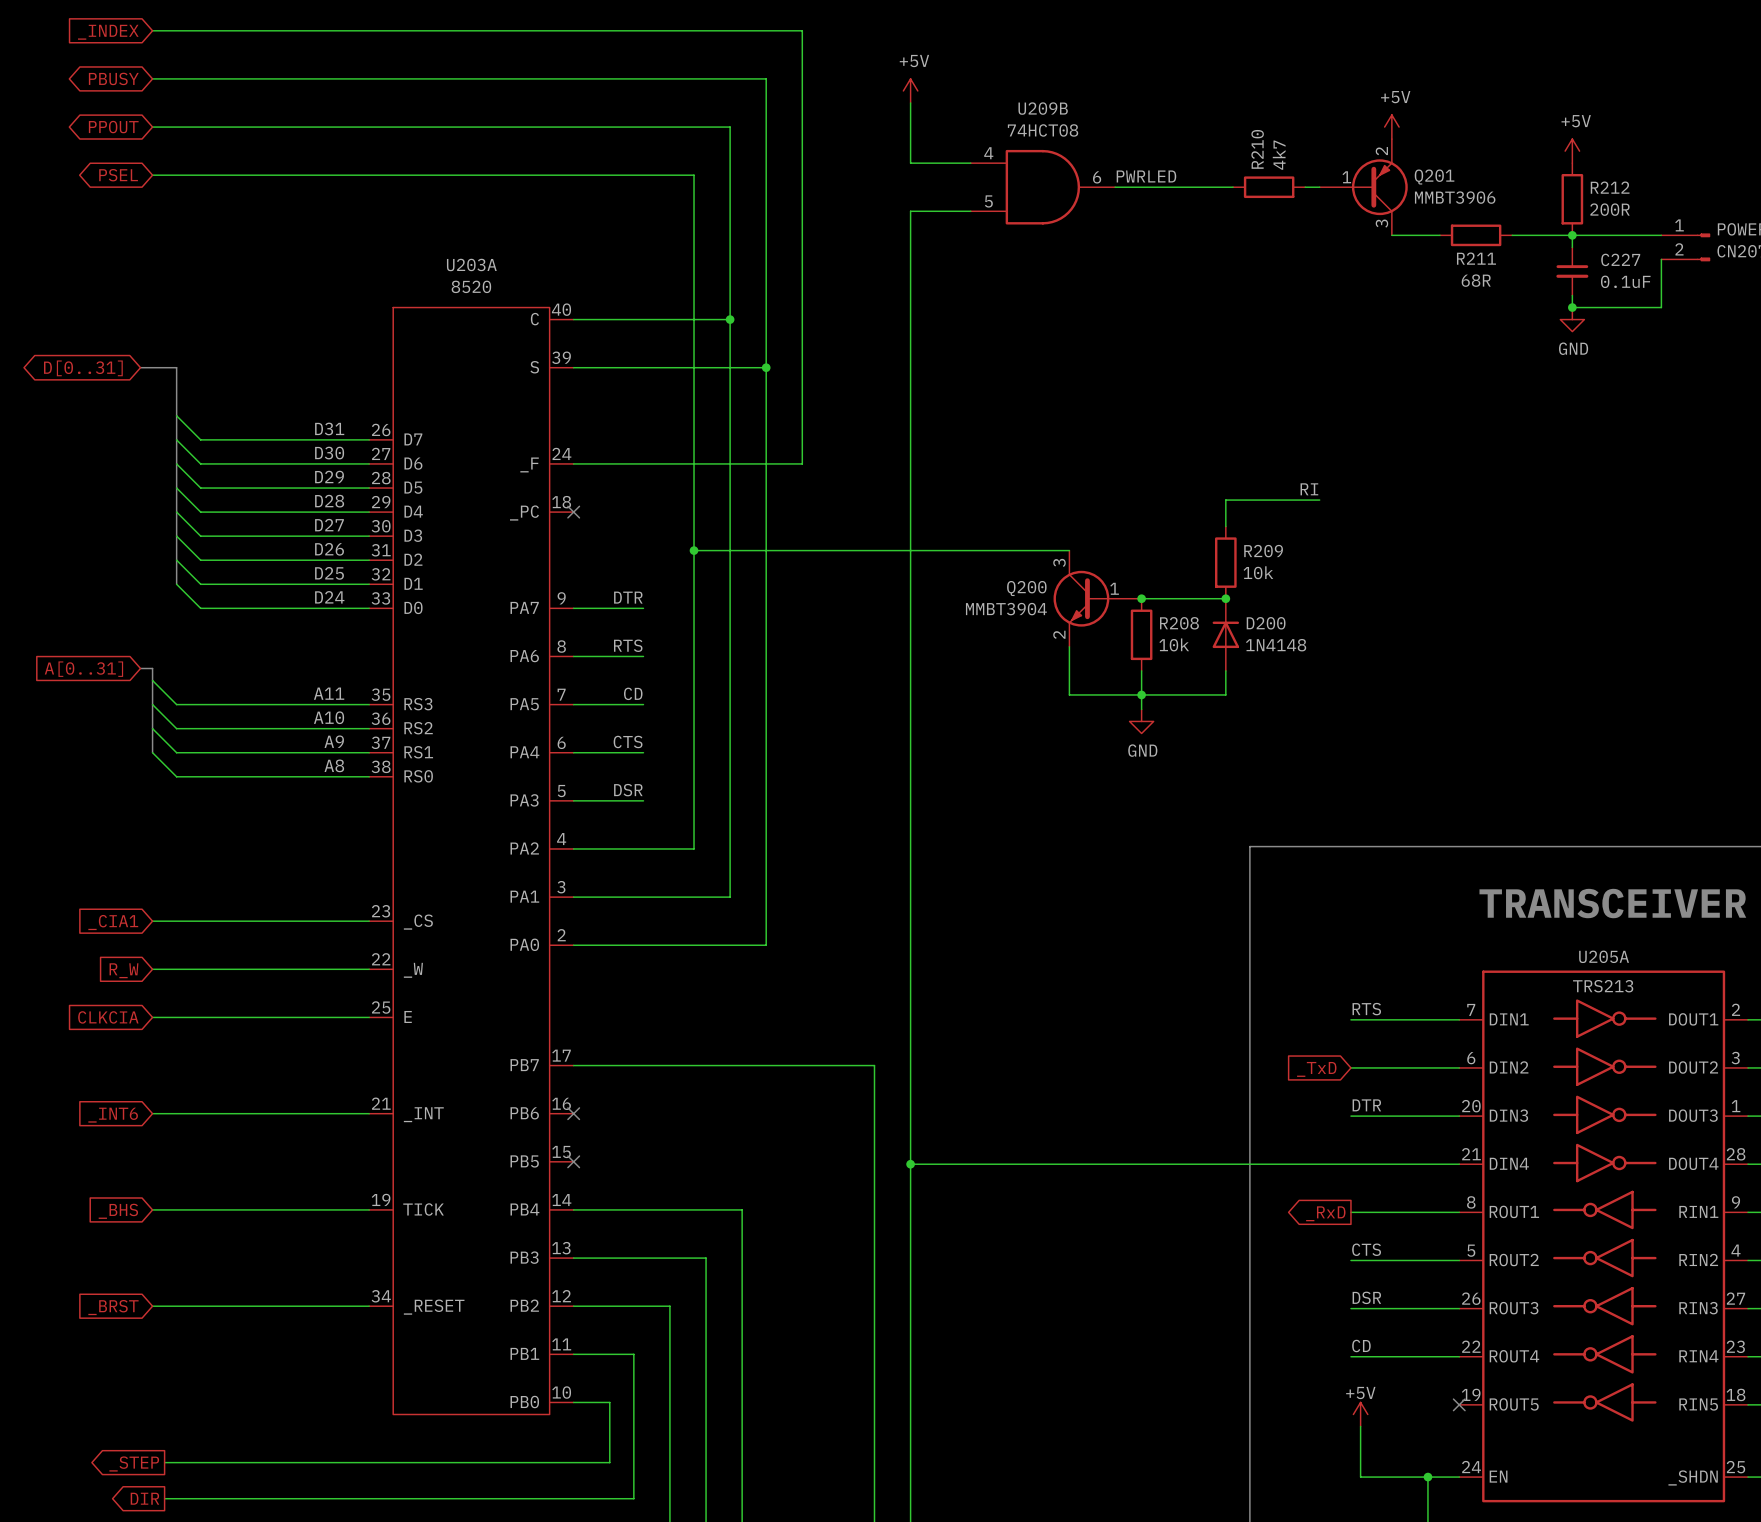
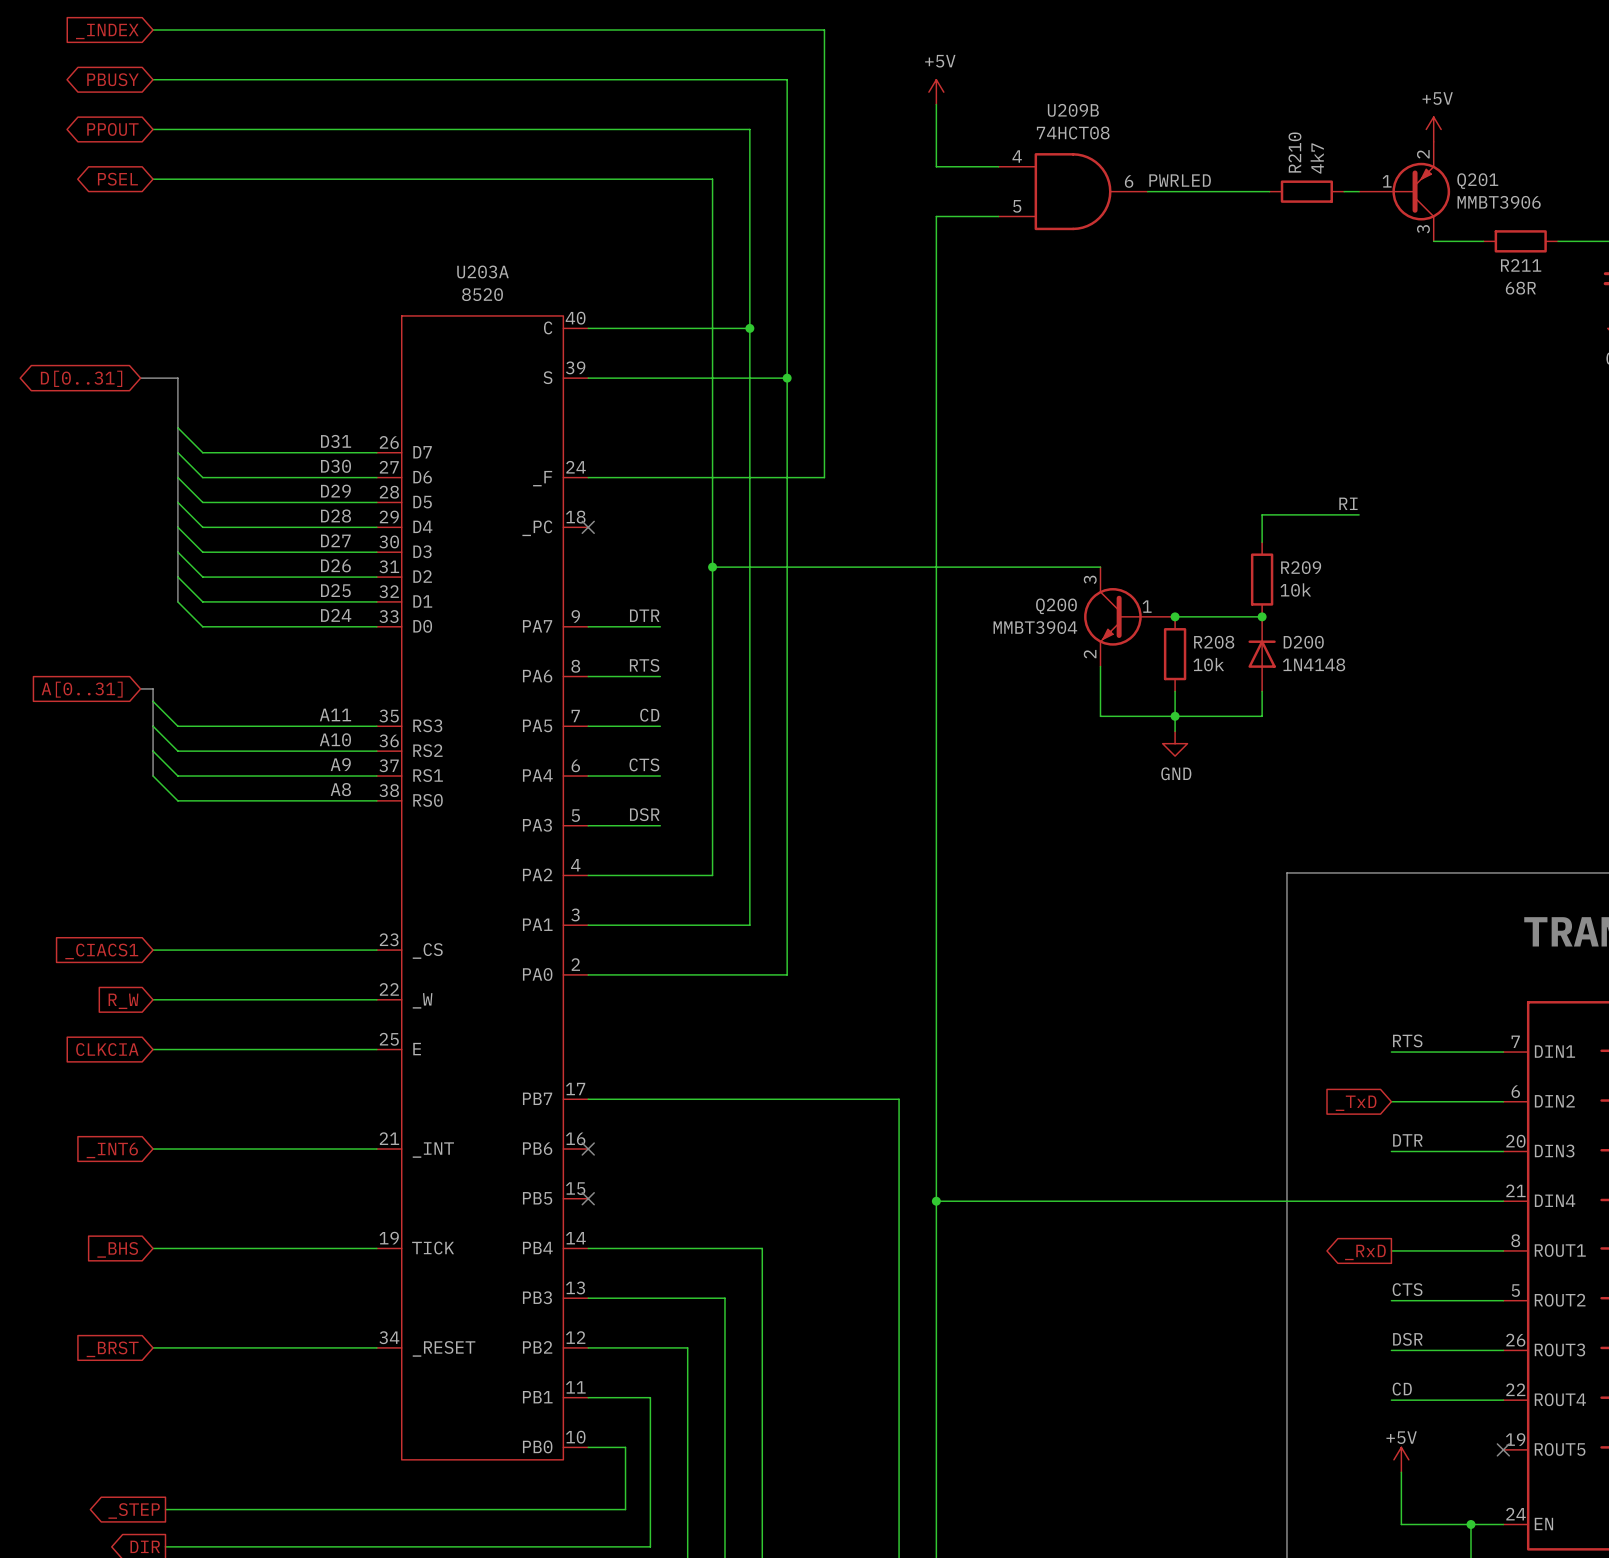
global label: _CIA1 (113, 922) -> _CIACS1 (101, 951)

